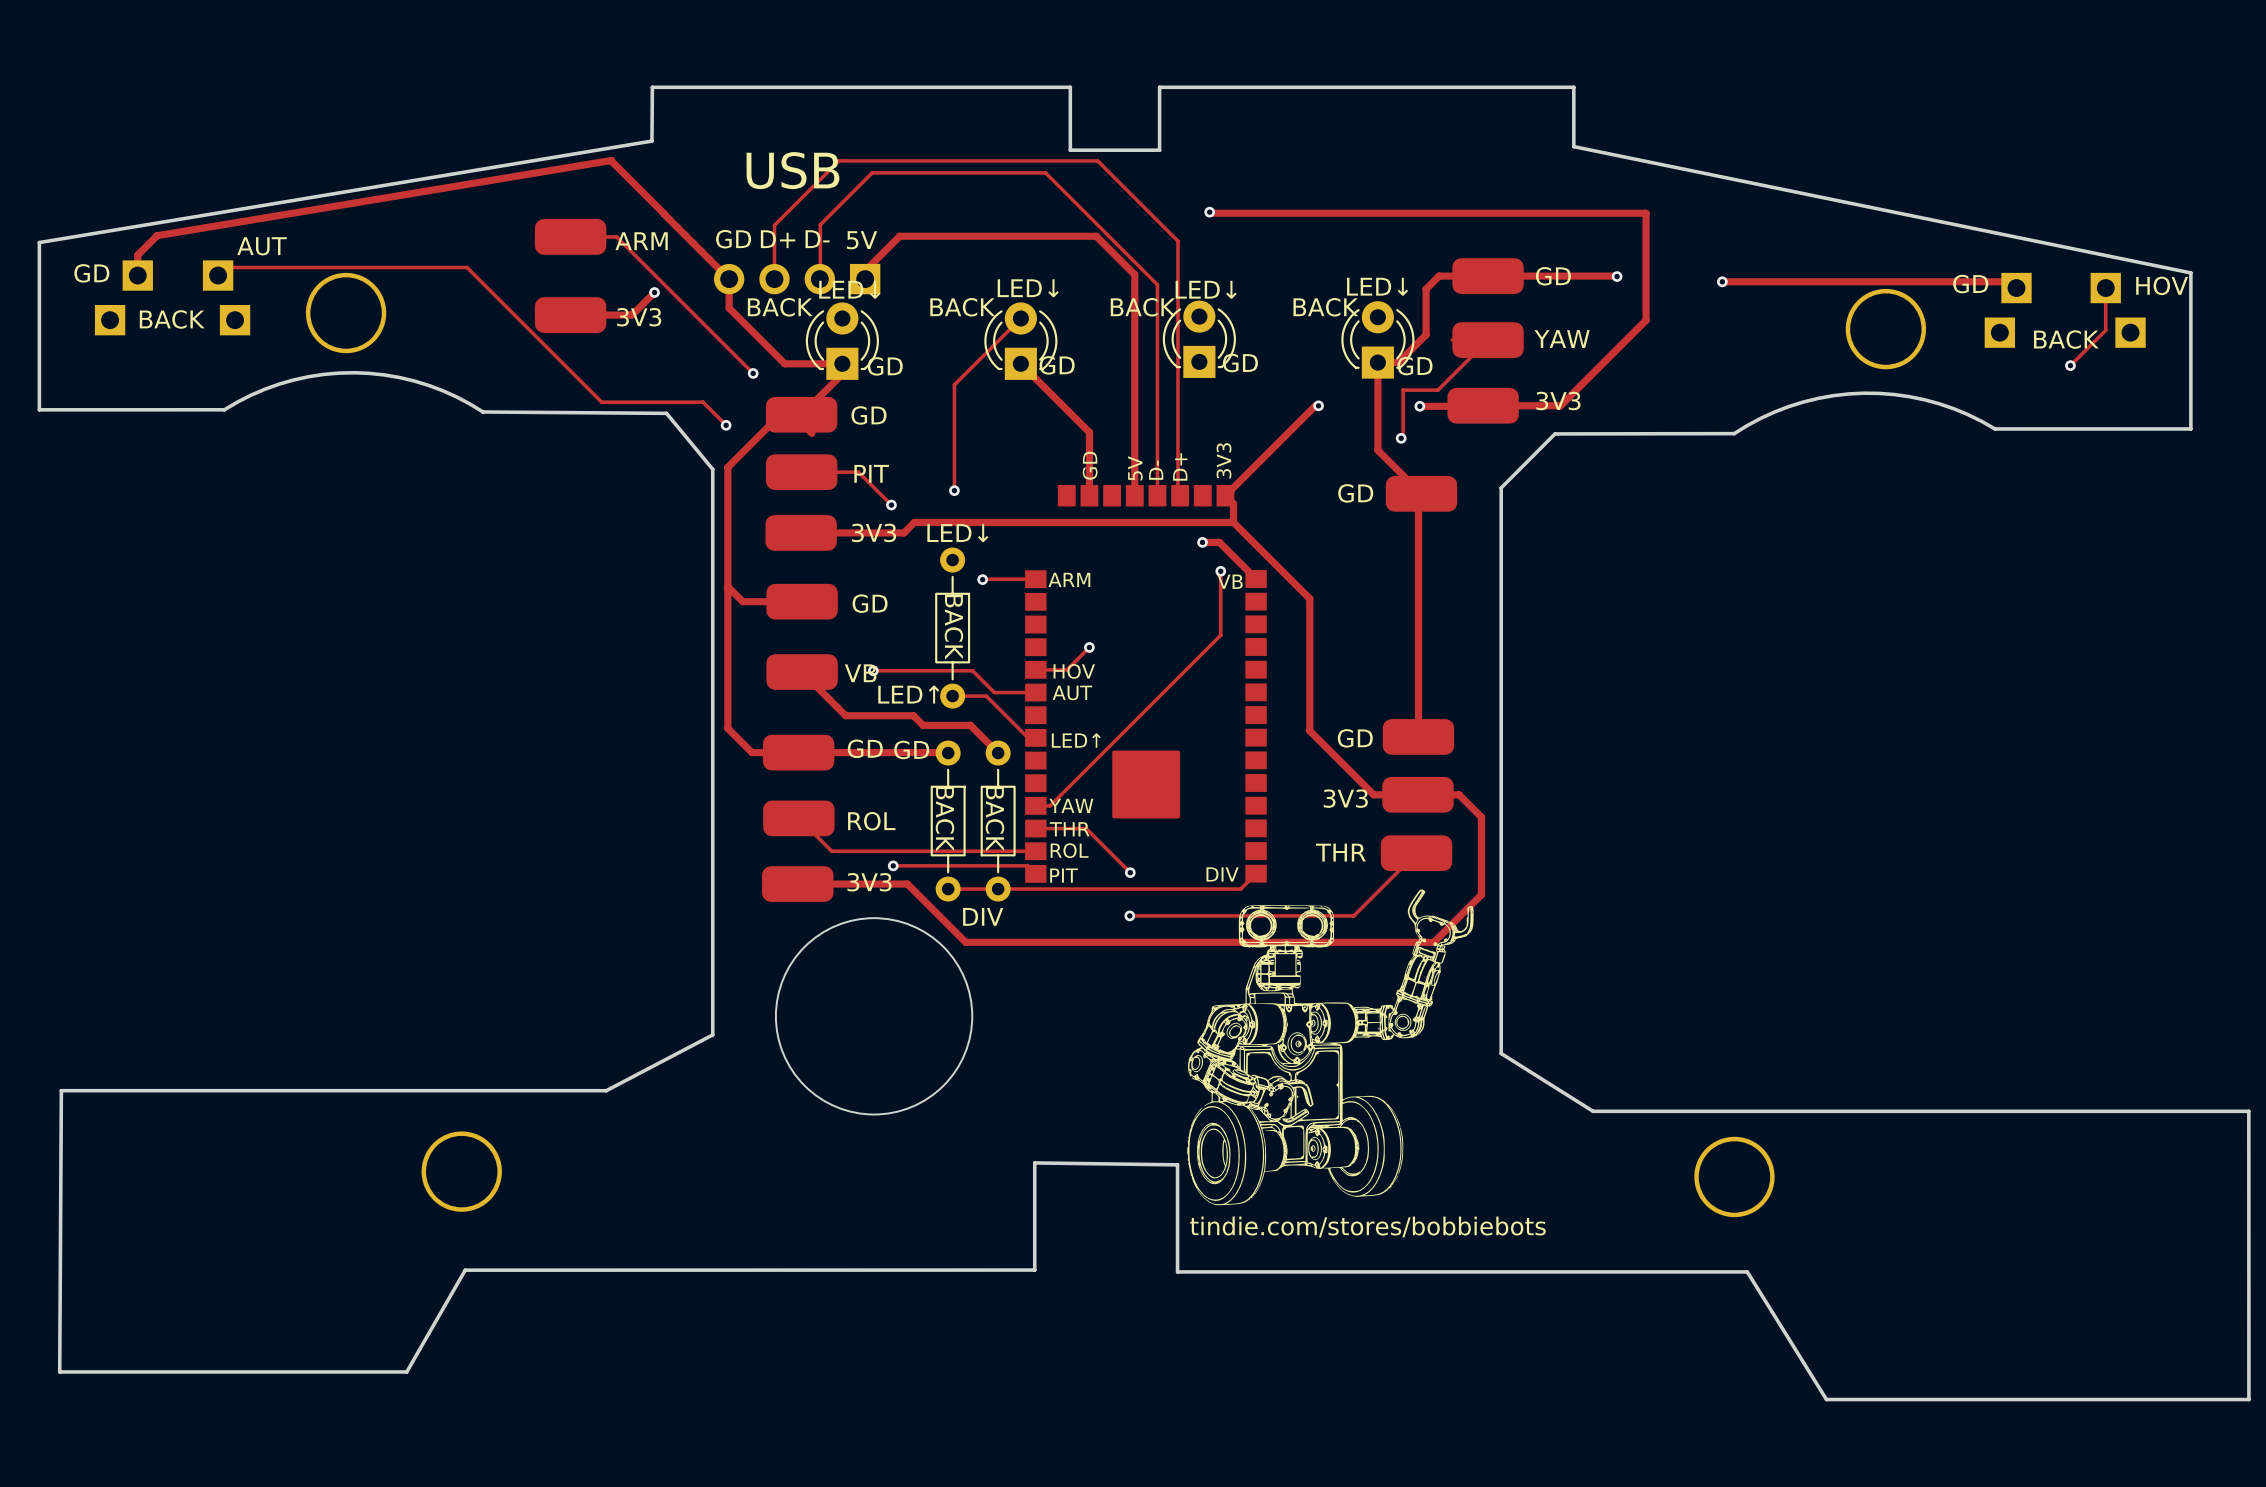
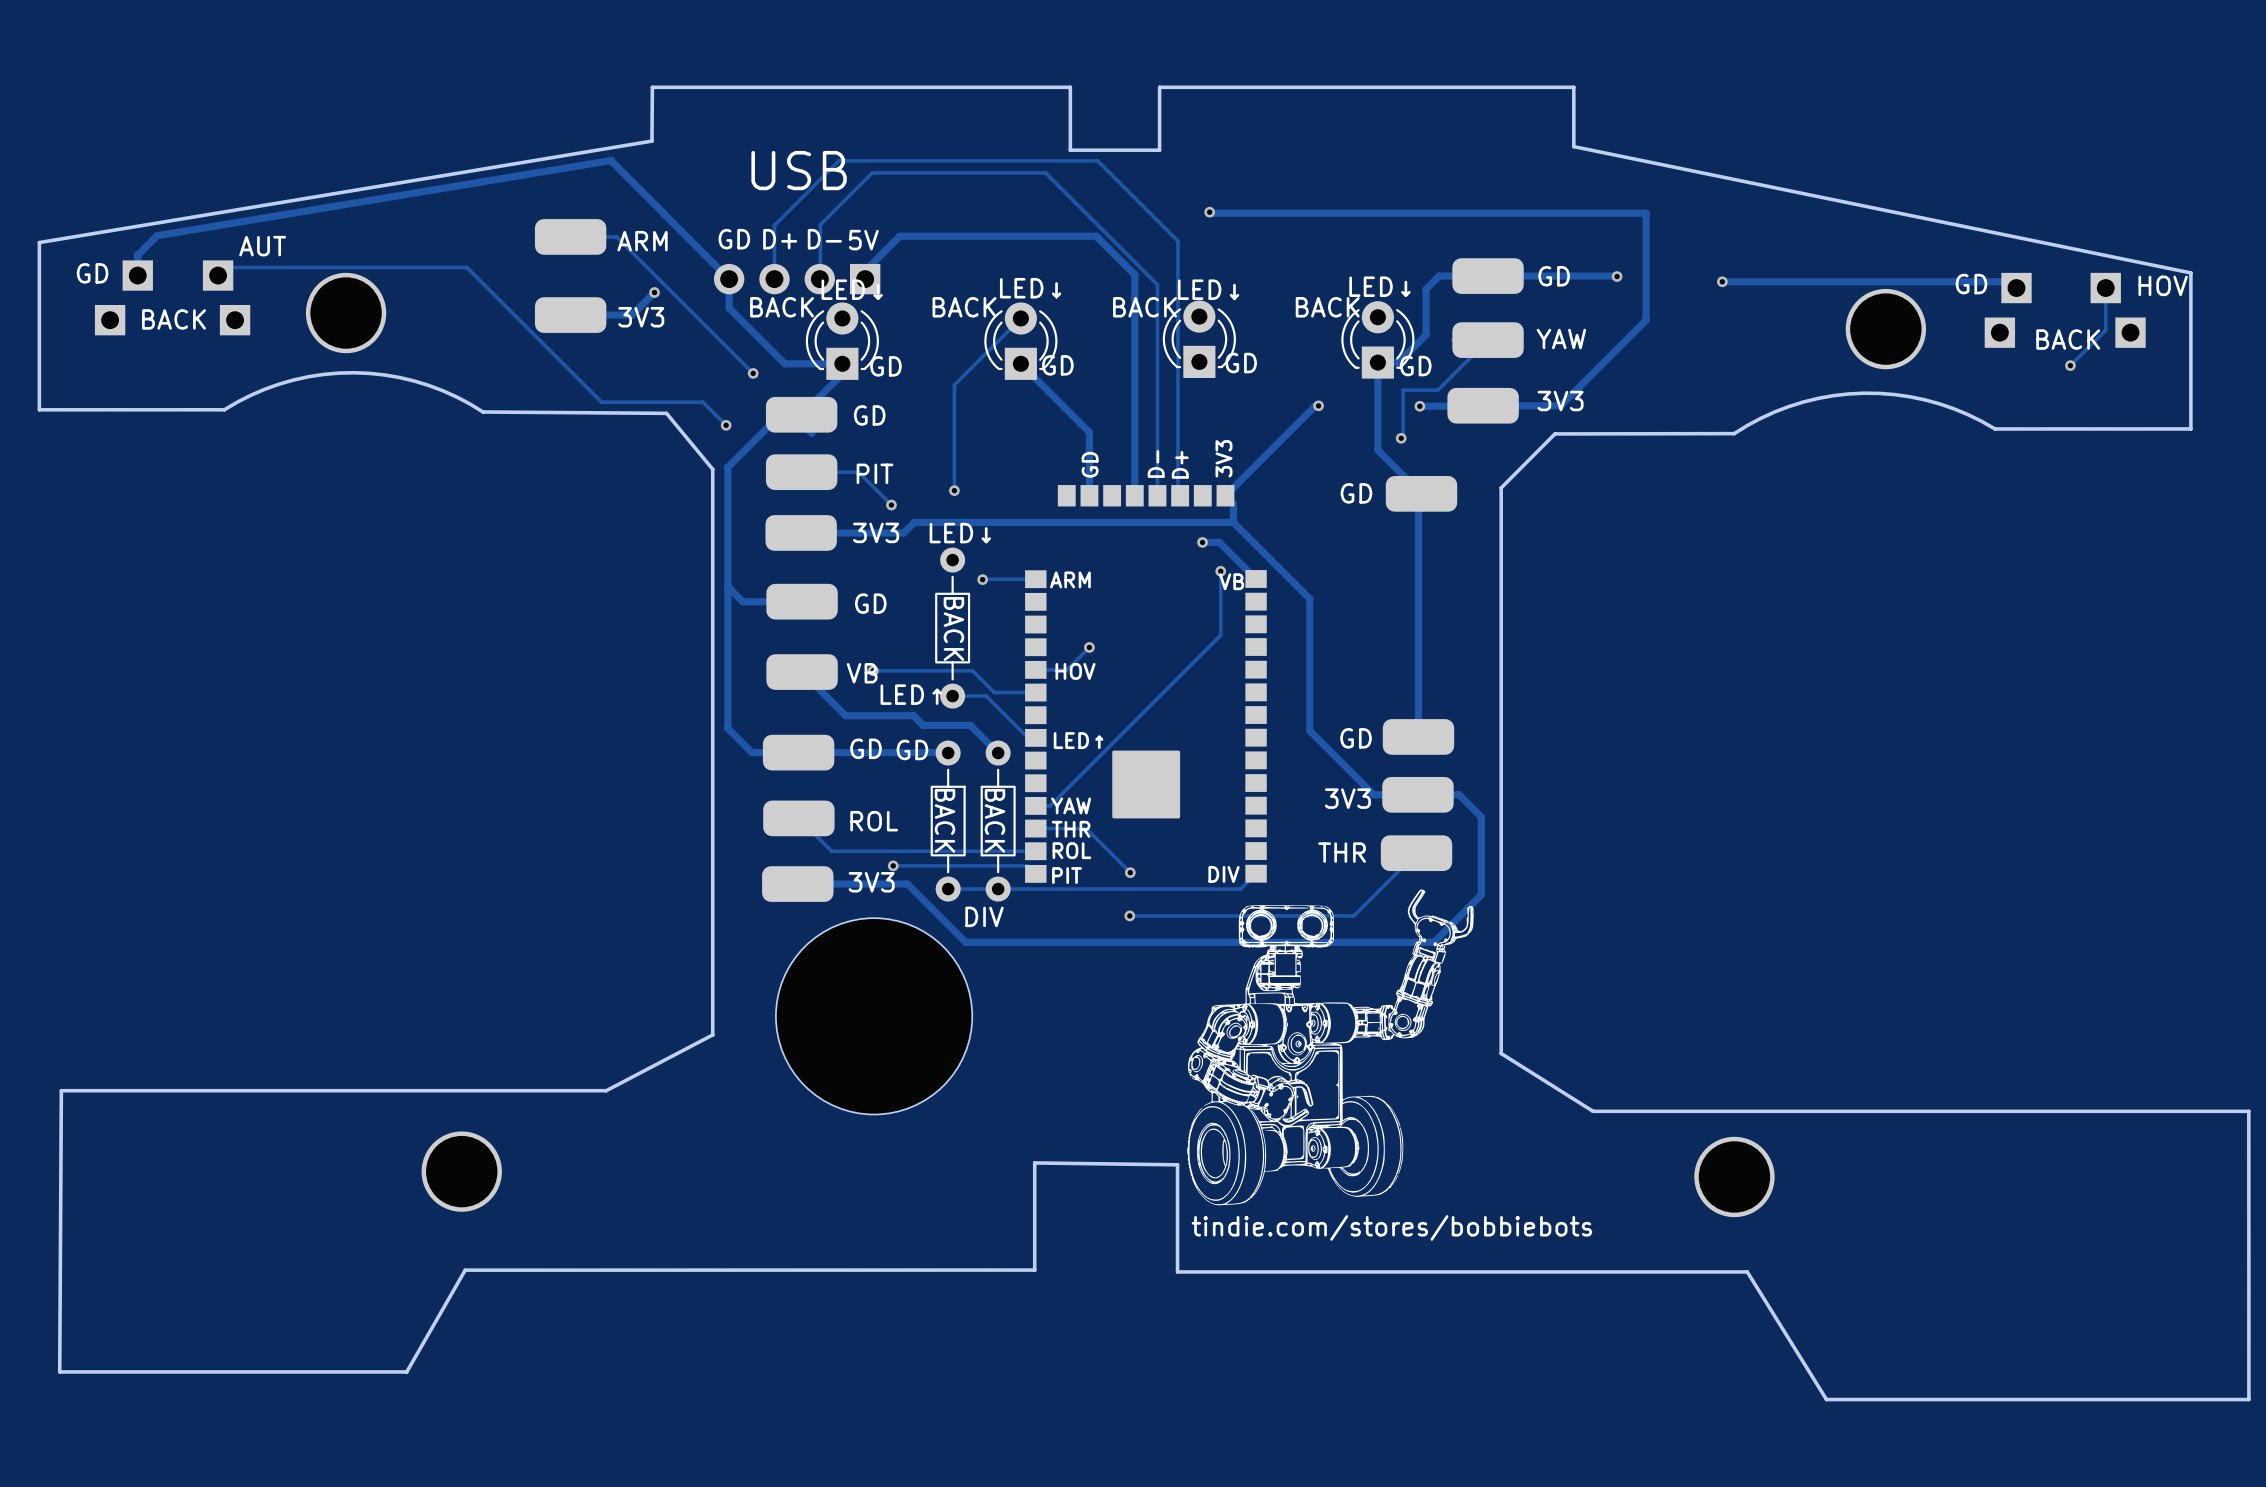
text: 5V (1135, 468) -> none
text: AUT (1072, 692) -> none

